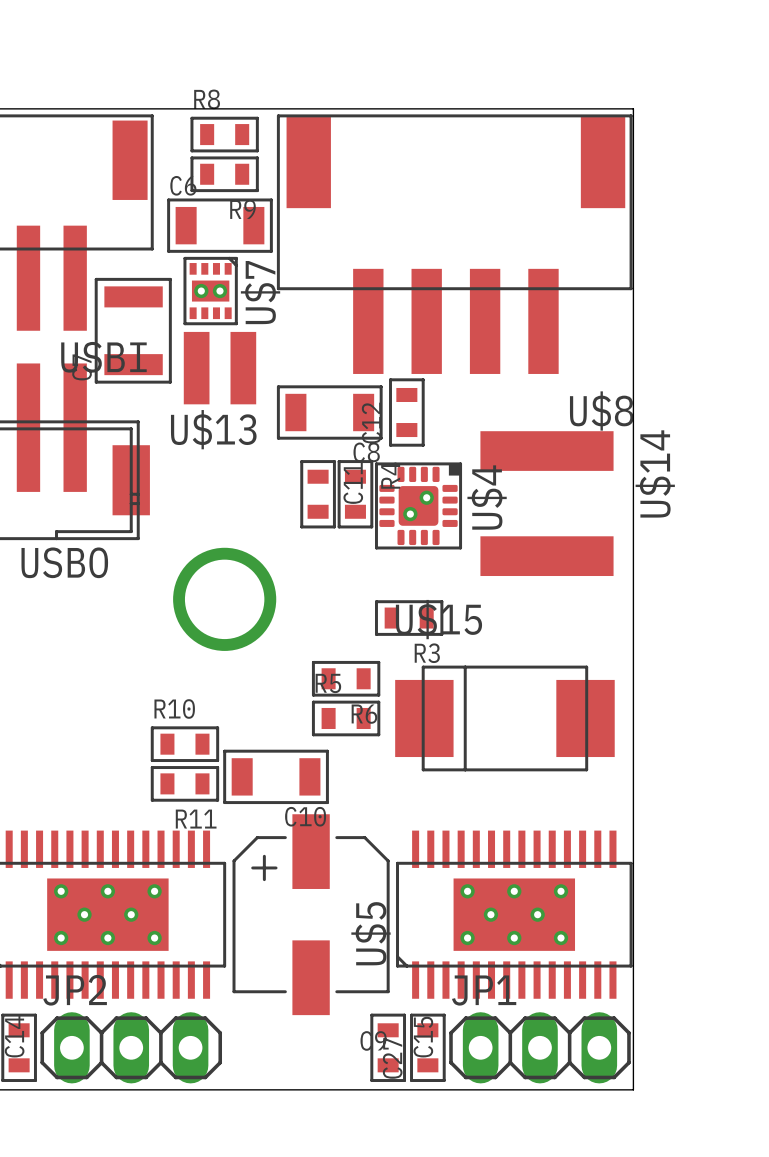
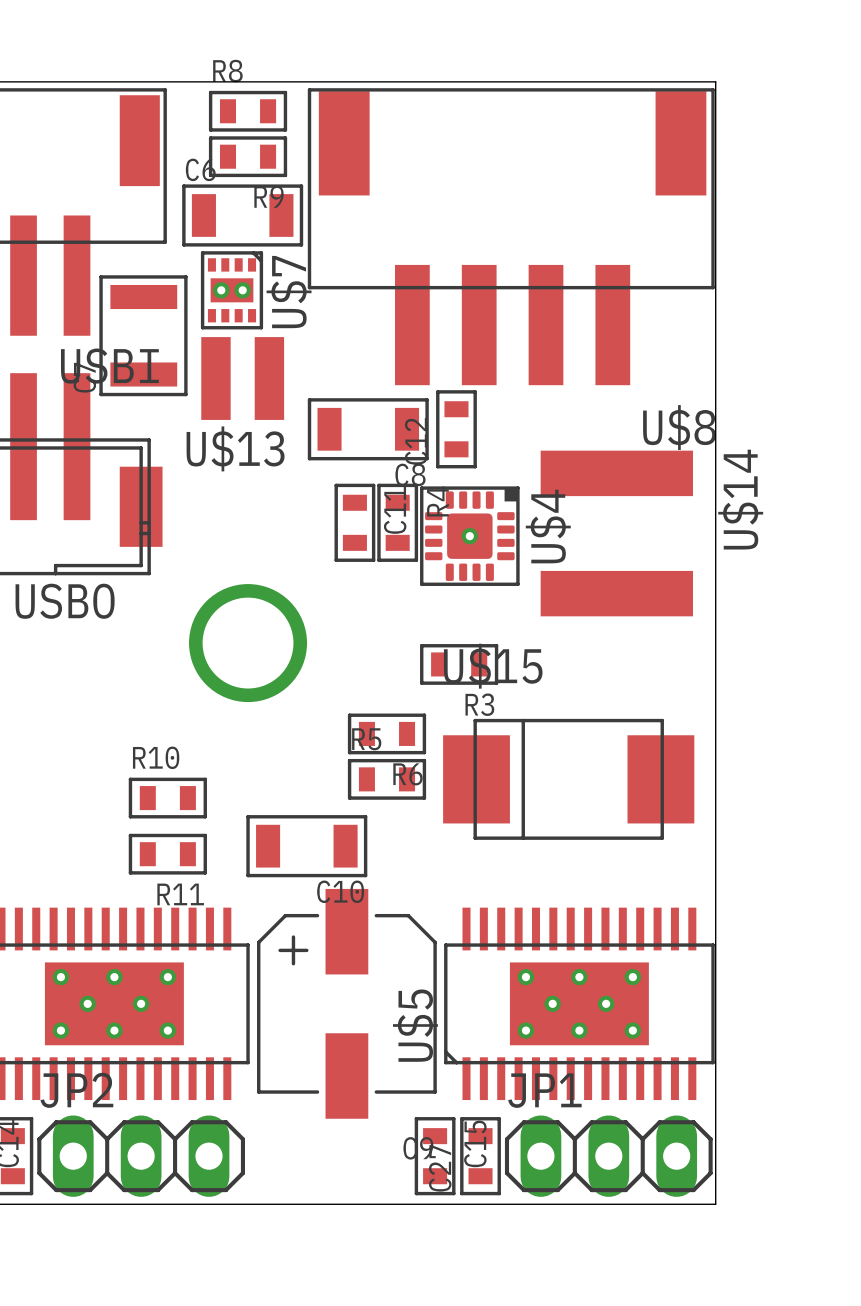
U$4 footprint: [375, 462, 463, 550] -> [420, 486, 520, 586]
R10 position: (184, 744) -> (167, 798)
R11 position: (184, 783) -> (167, 854)

